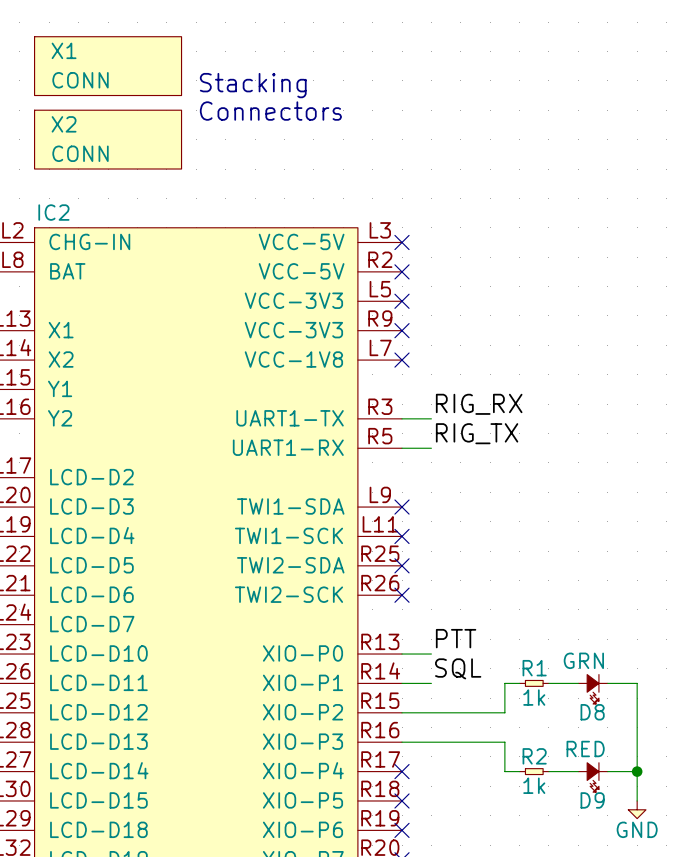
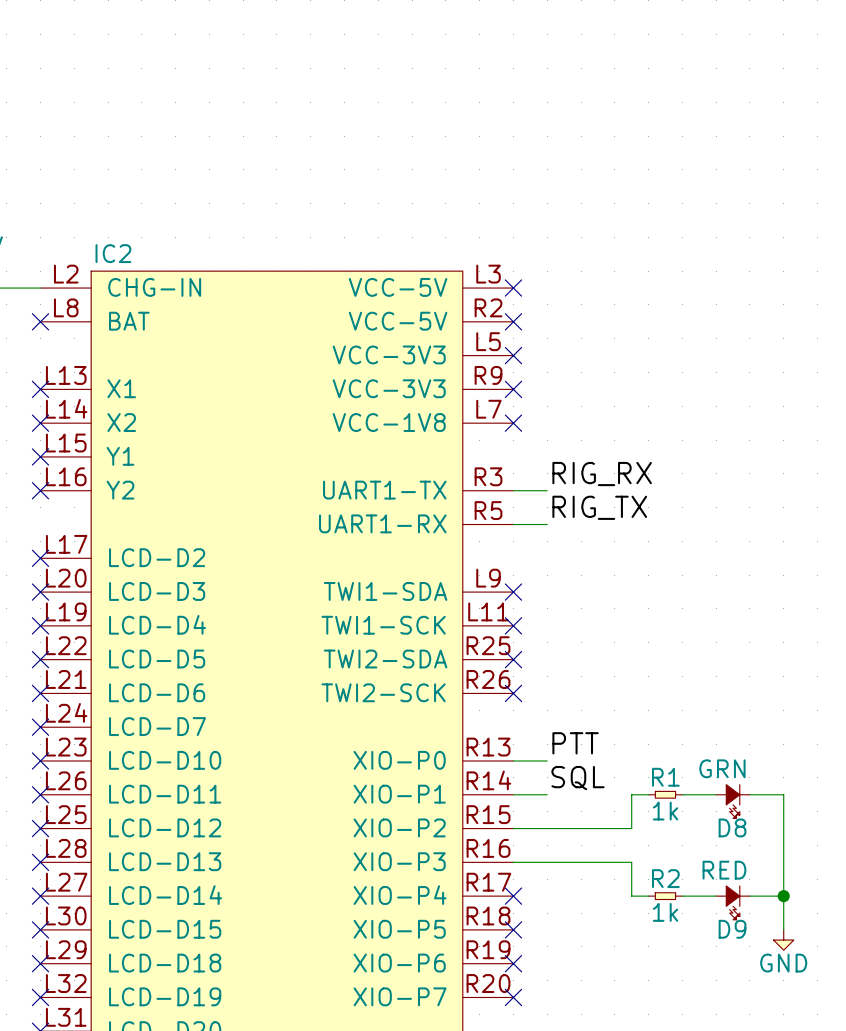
X1: CONN (108, 66) -> none
text: Stacking (253, 85) -> none
text: Connectors (270, 111) -> none
X2: CONN (108, 139) -> none

